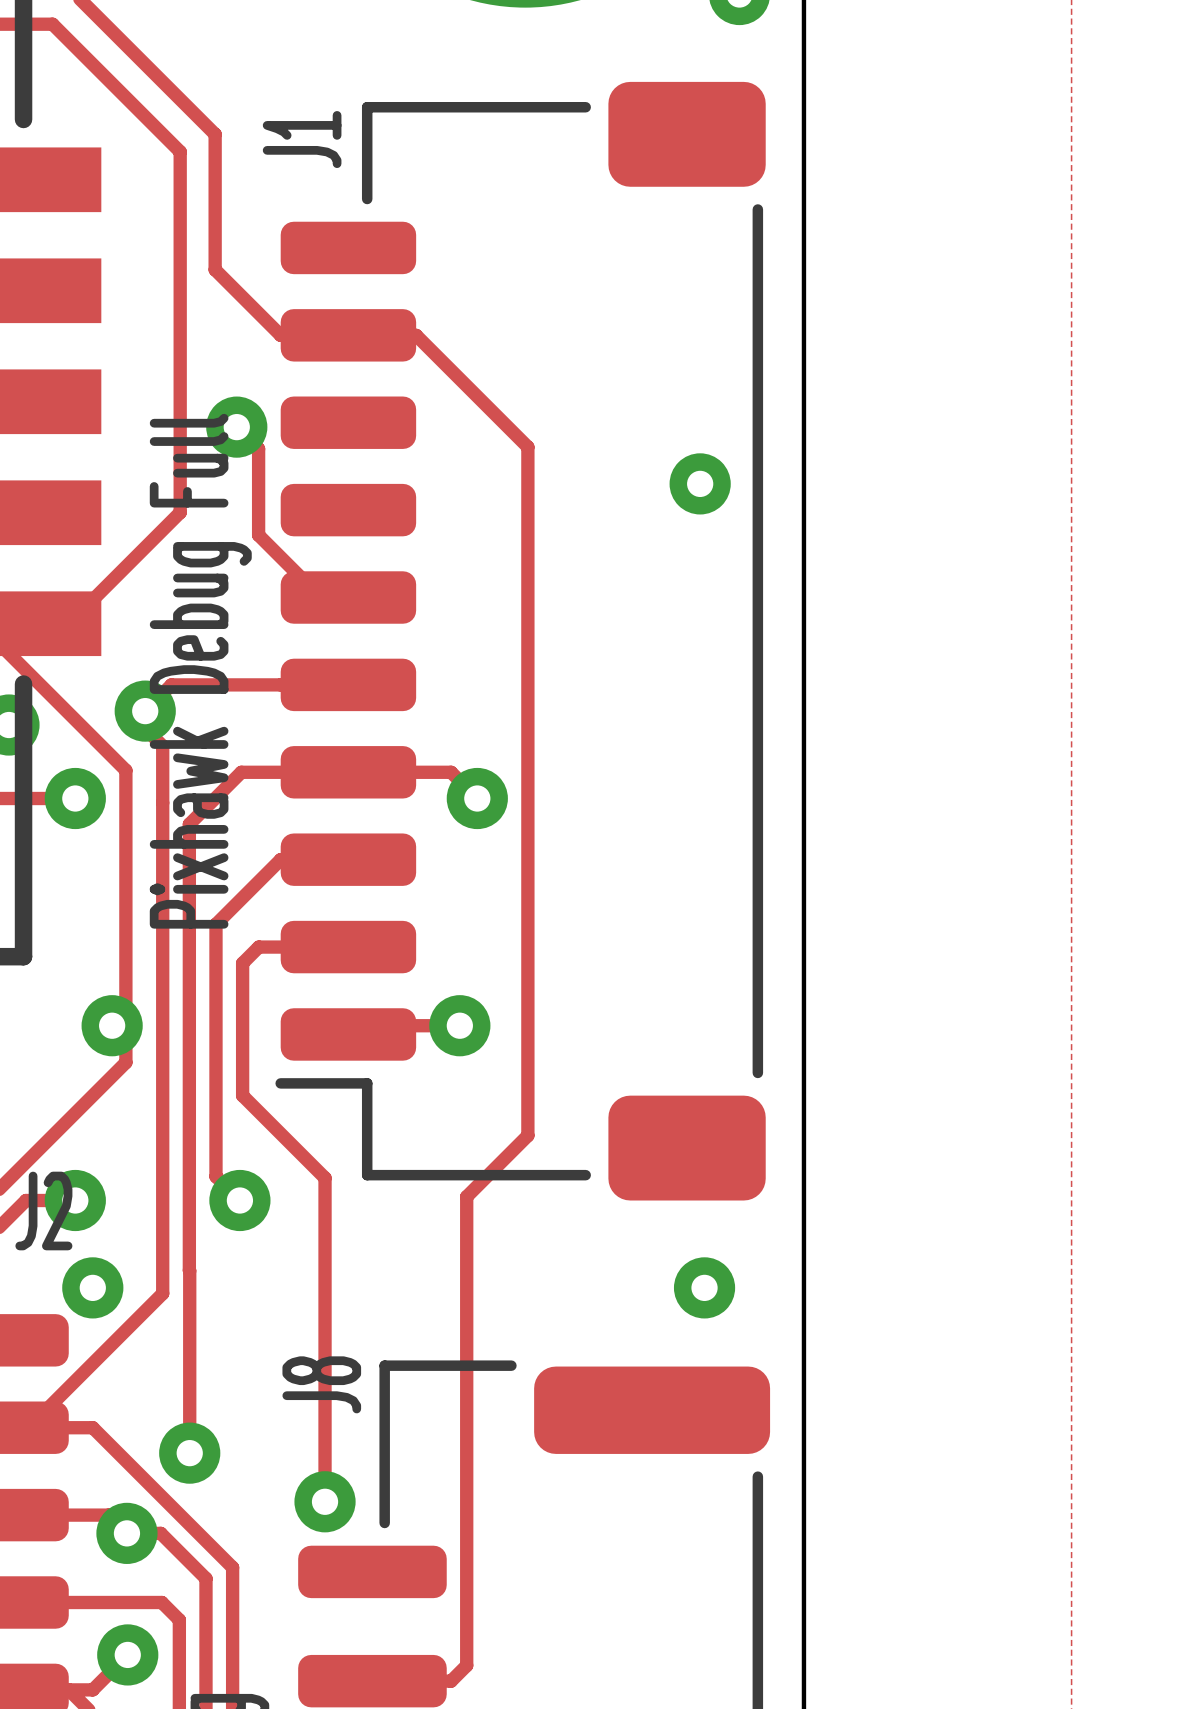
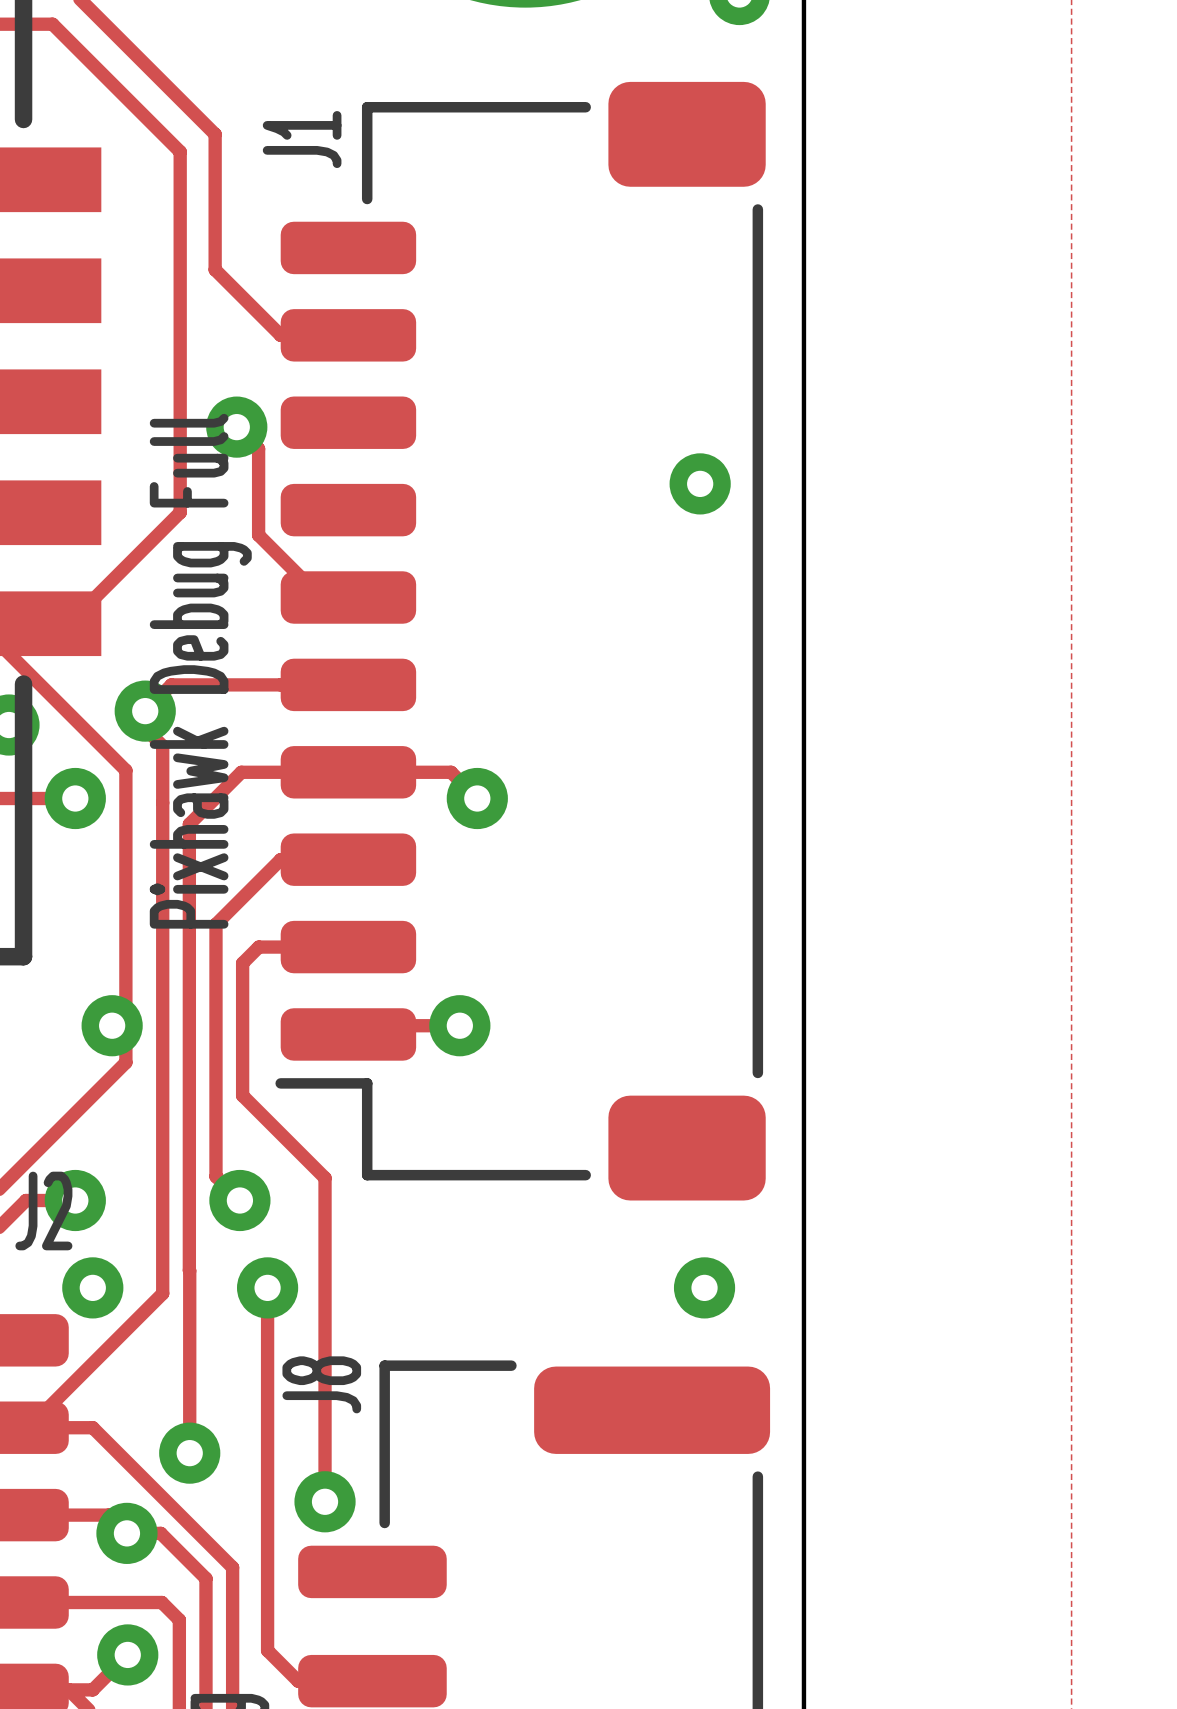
track: (348, 335) (416, 335) (527, 447) (527, 1135) (466, 1196) (466, 1665) (451, 1681) (372, 1681) -> (267, 1287) (267, 1650) (298, 1681) (372, 1681)
via: none -> (267, 1287)

